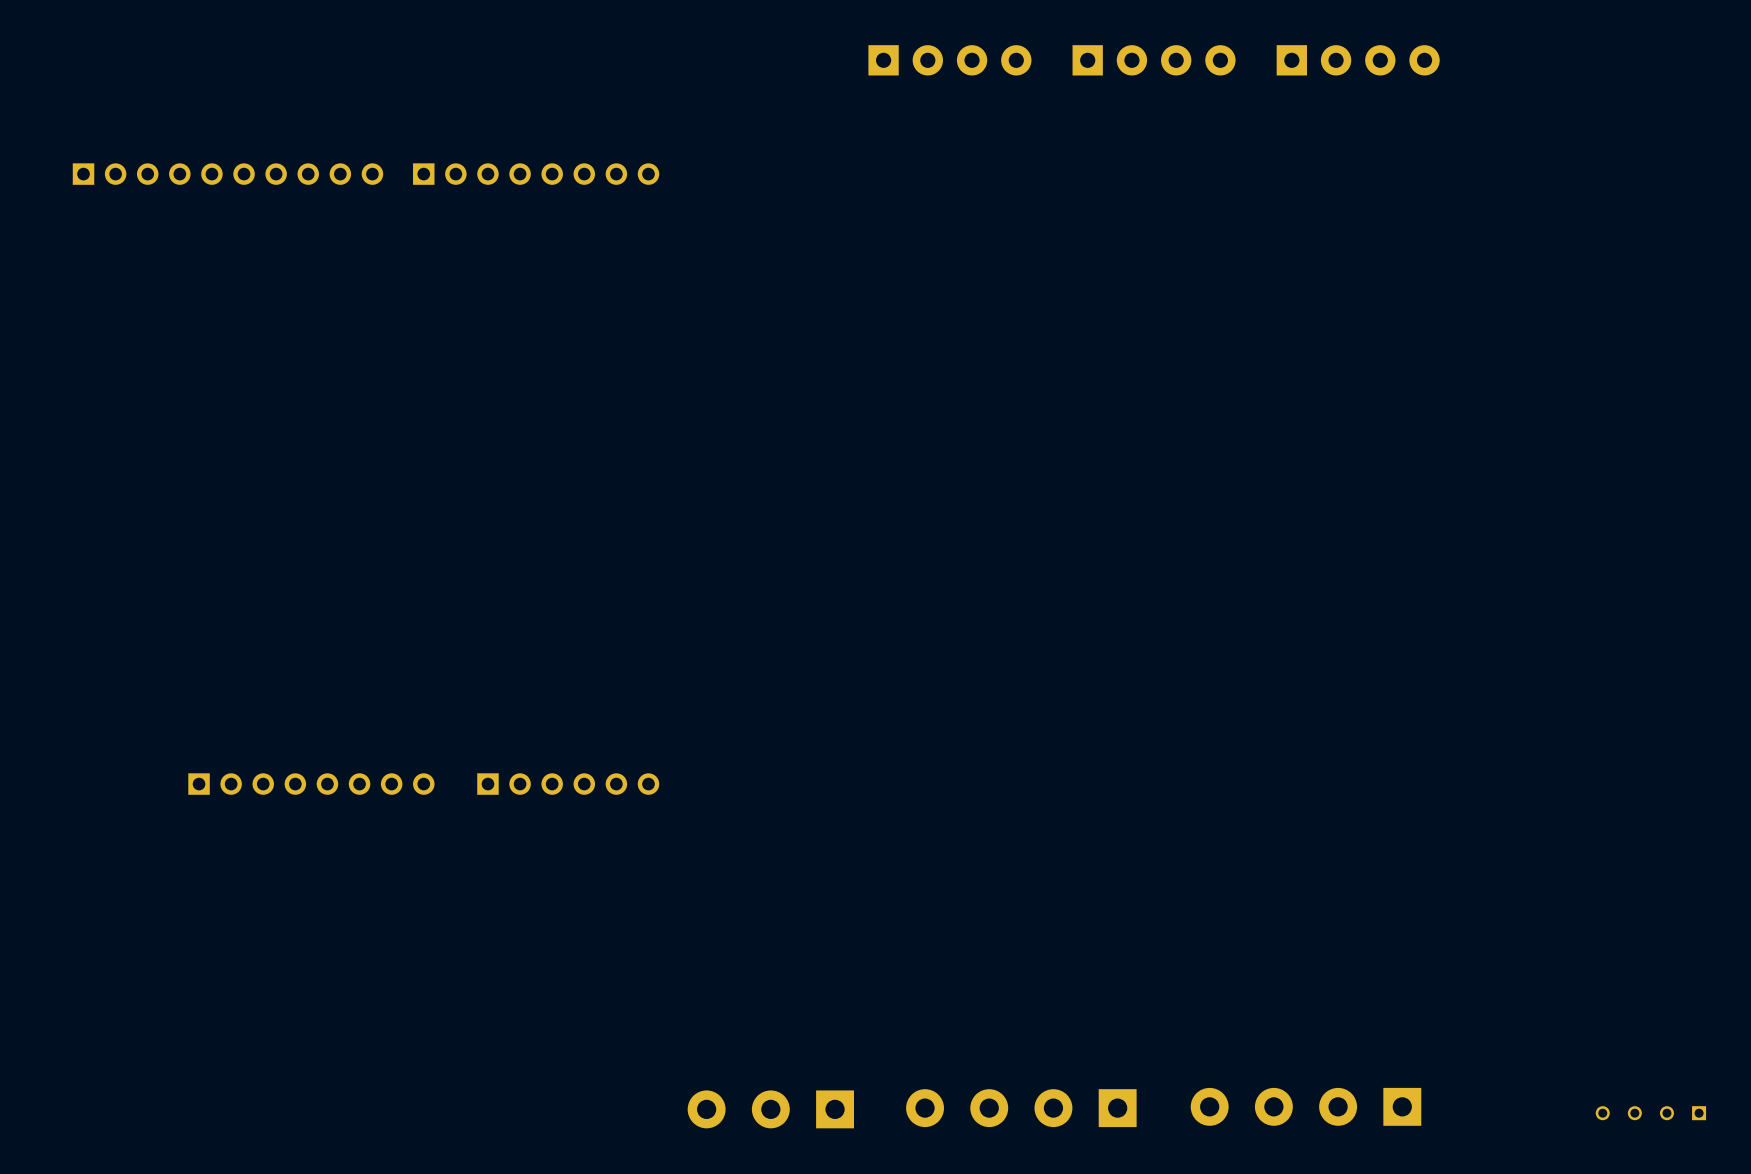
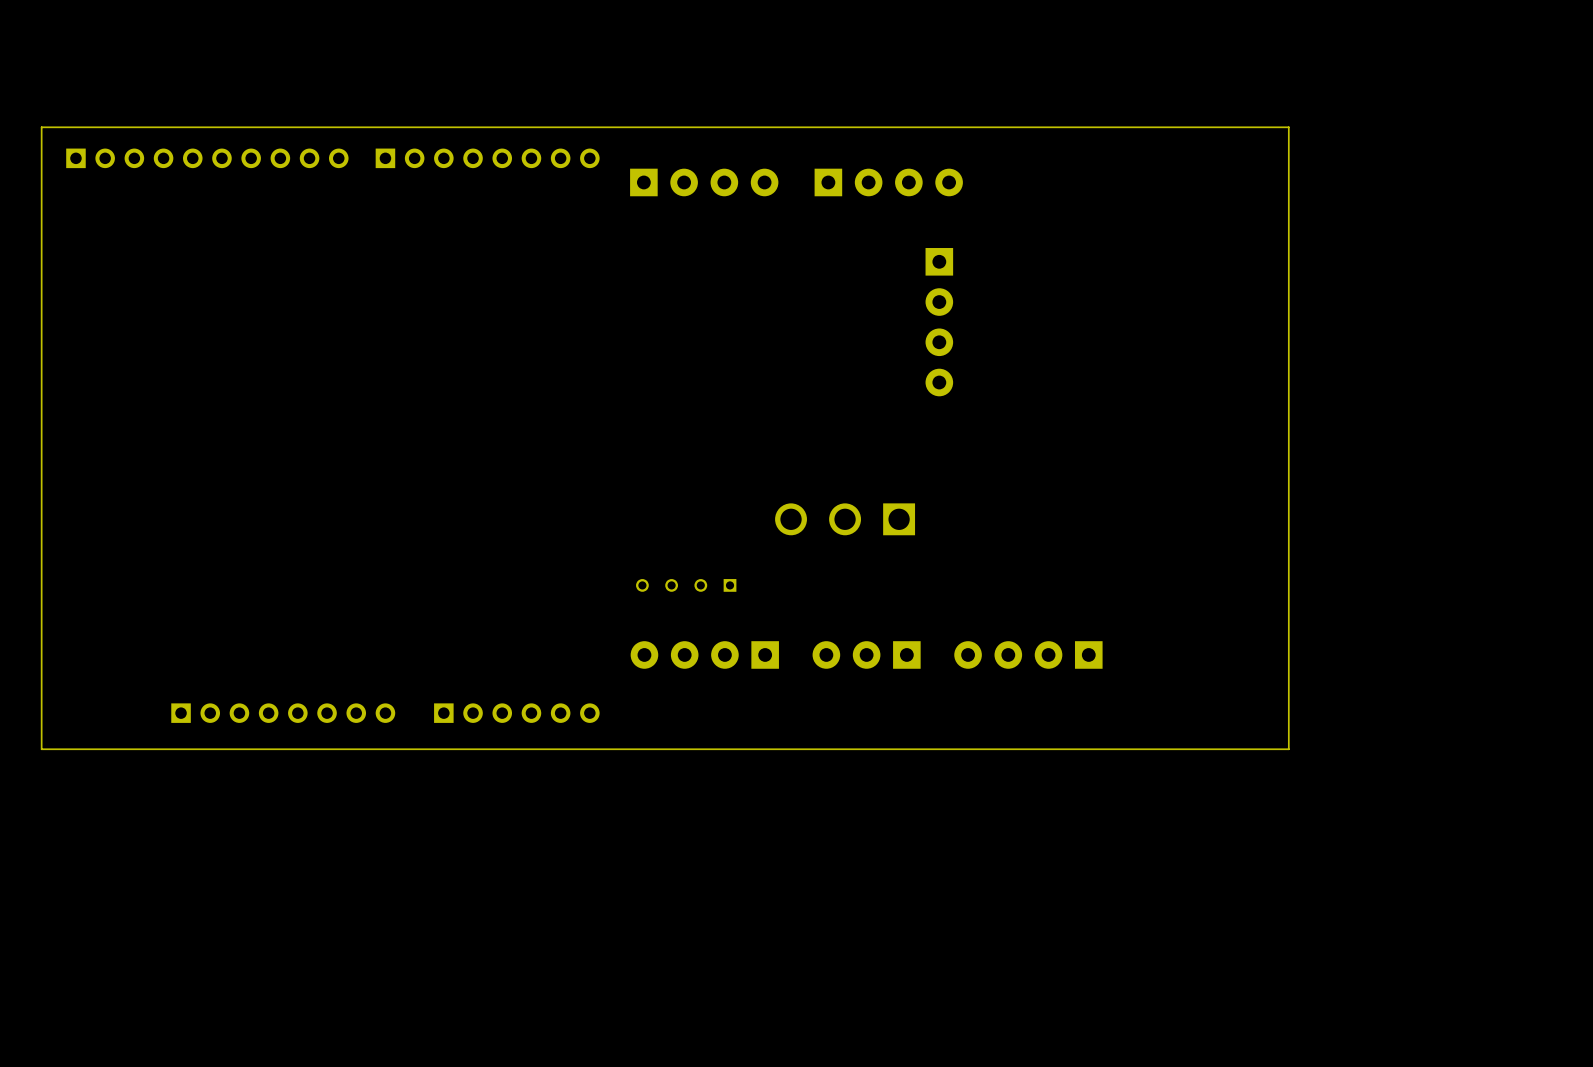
part: (949, 60) -> none
part: (1154, 60) -> none
part: (1358, 60) -> none
board edge: none -> (1288, 127) (41, 127) (41, 749) (1288, 749) (1288, 127)
part: none -> (704, 182)
part: none -> (888, 182)
part: none -> (939, 322)
part: none -> (845, 519)
part: none -> (686, 585)
part: none -> (704, 654)
part: none -> (866, 654)
part: none -> (1028, 654)
part: (1305, 1106) -> none
part: (1021, 1108) -> none
part: (770, 1109) -> none
part: (1650, 1113) -> none

